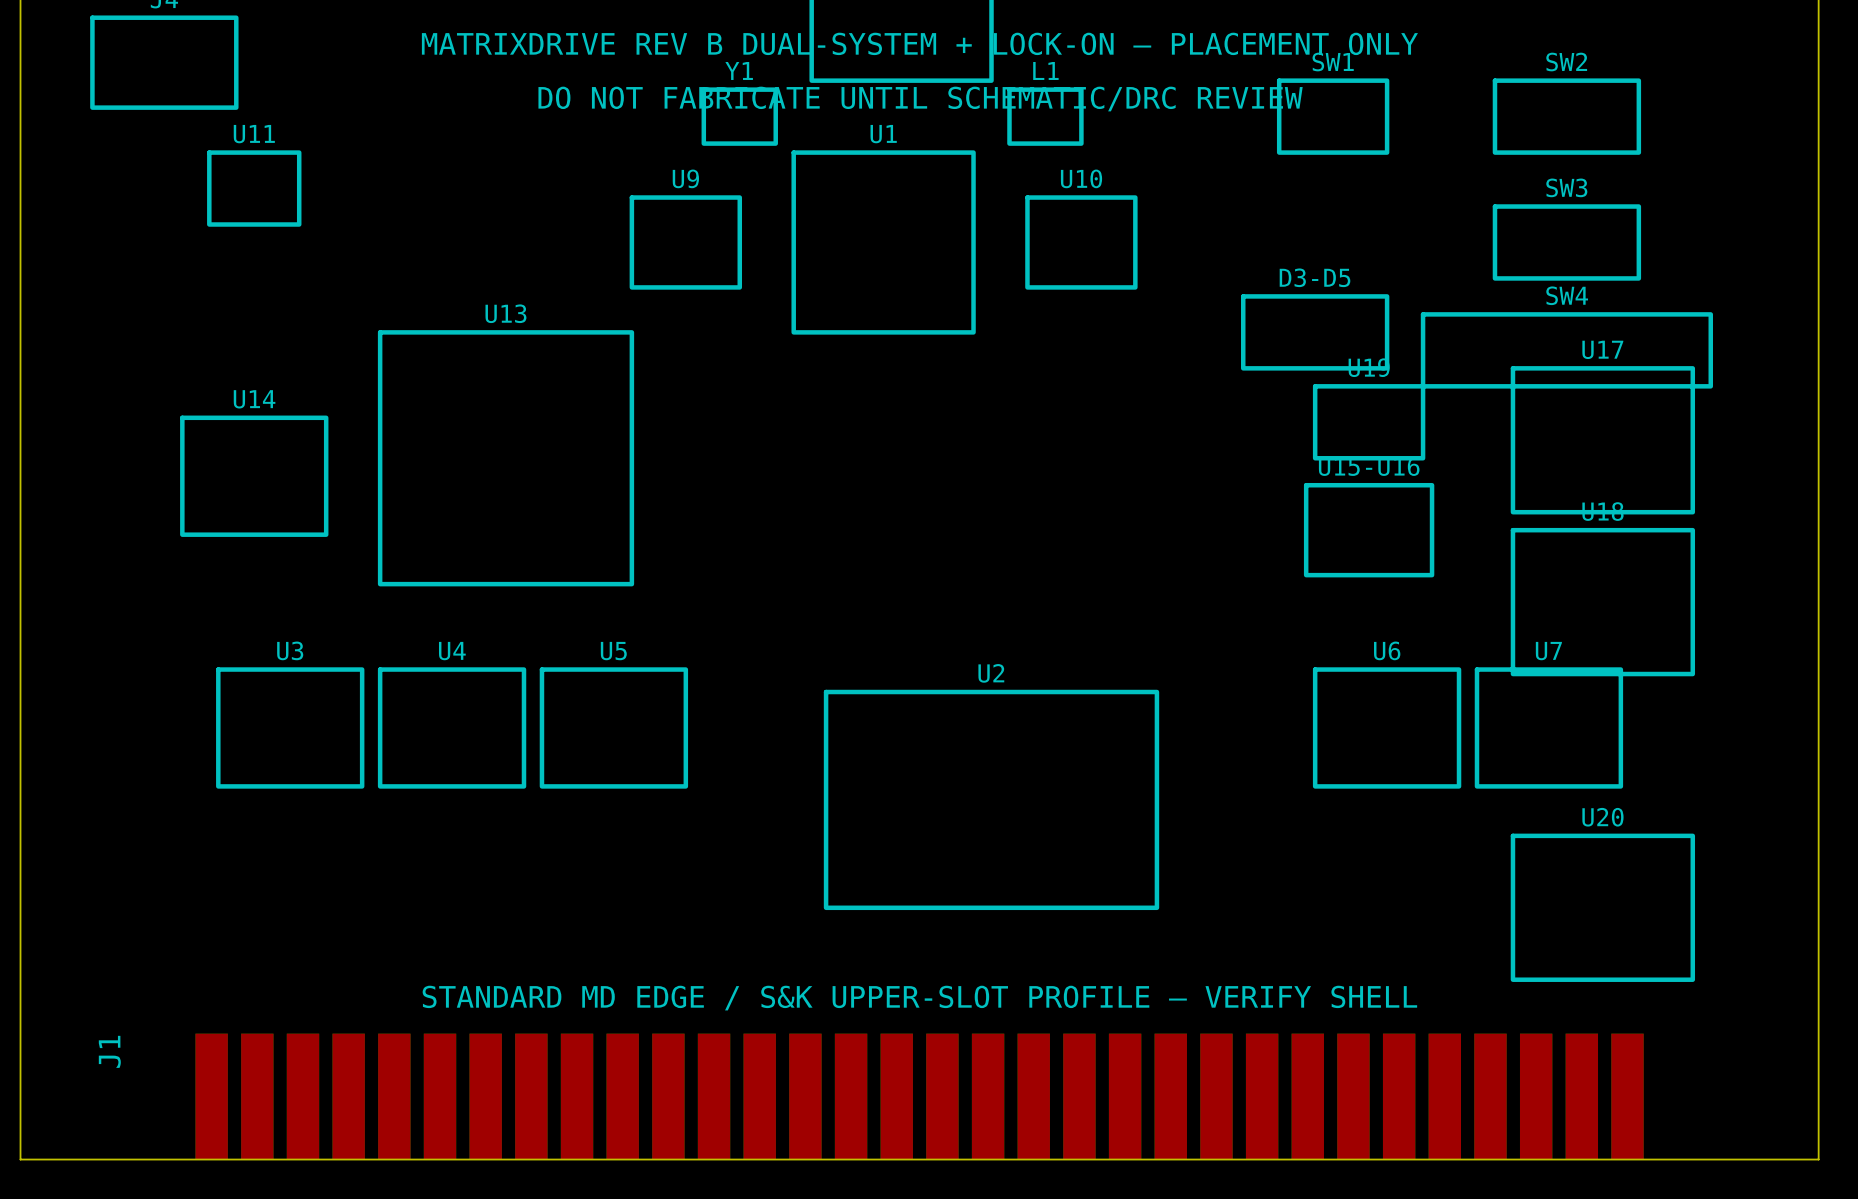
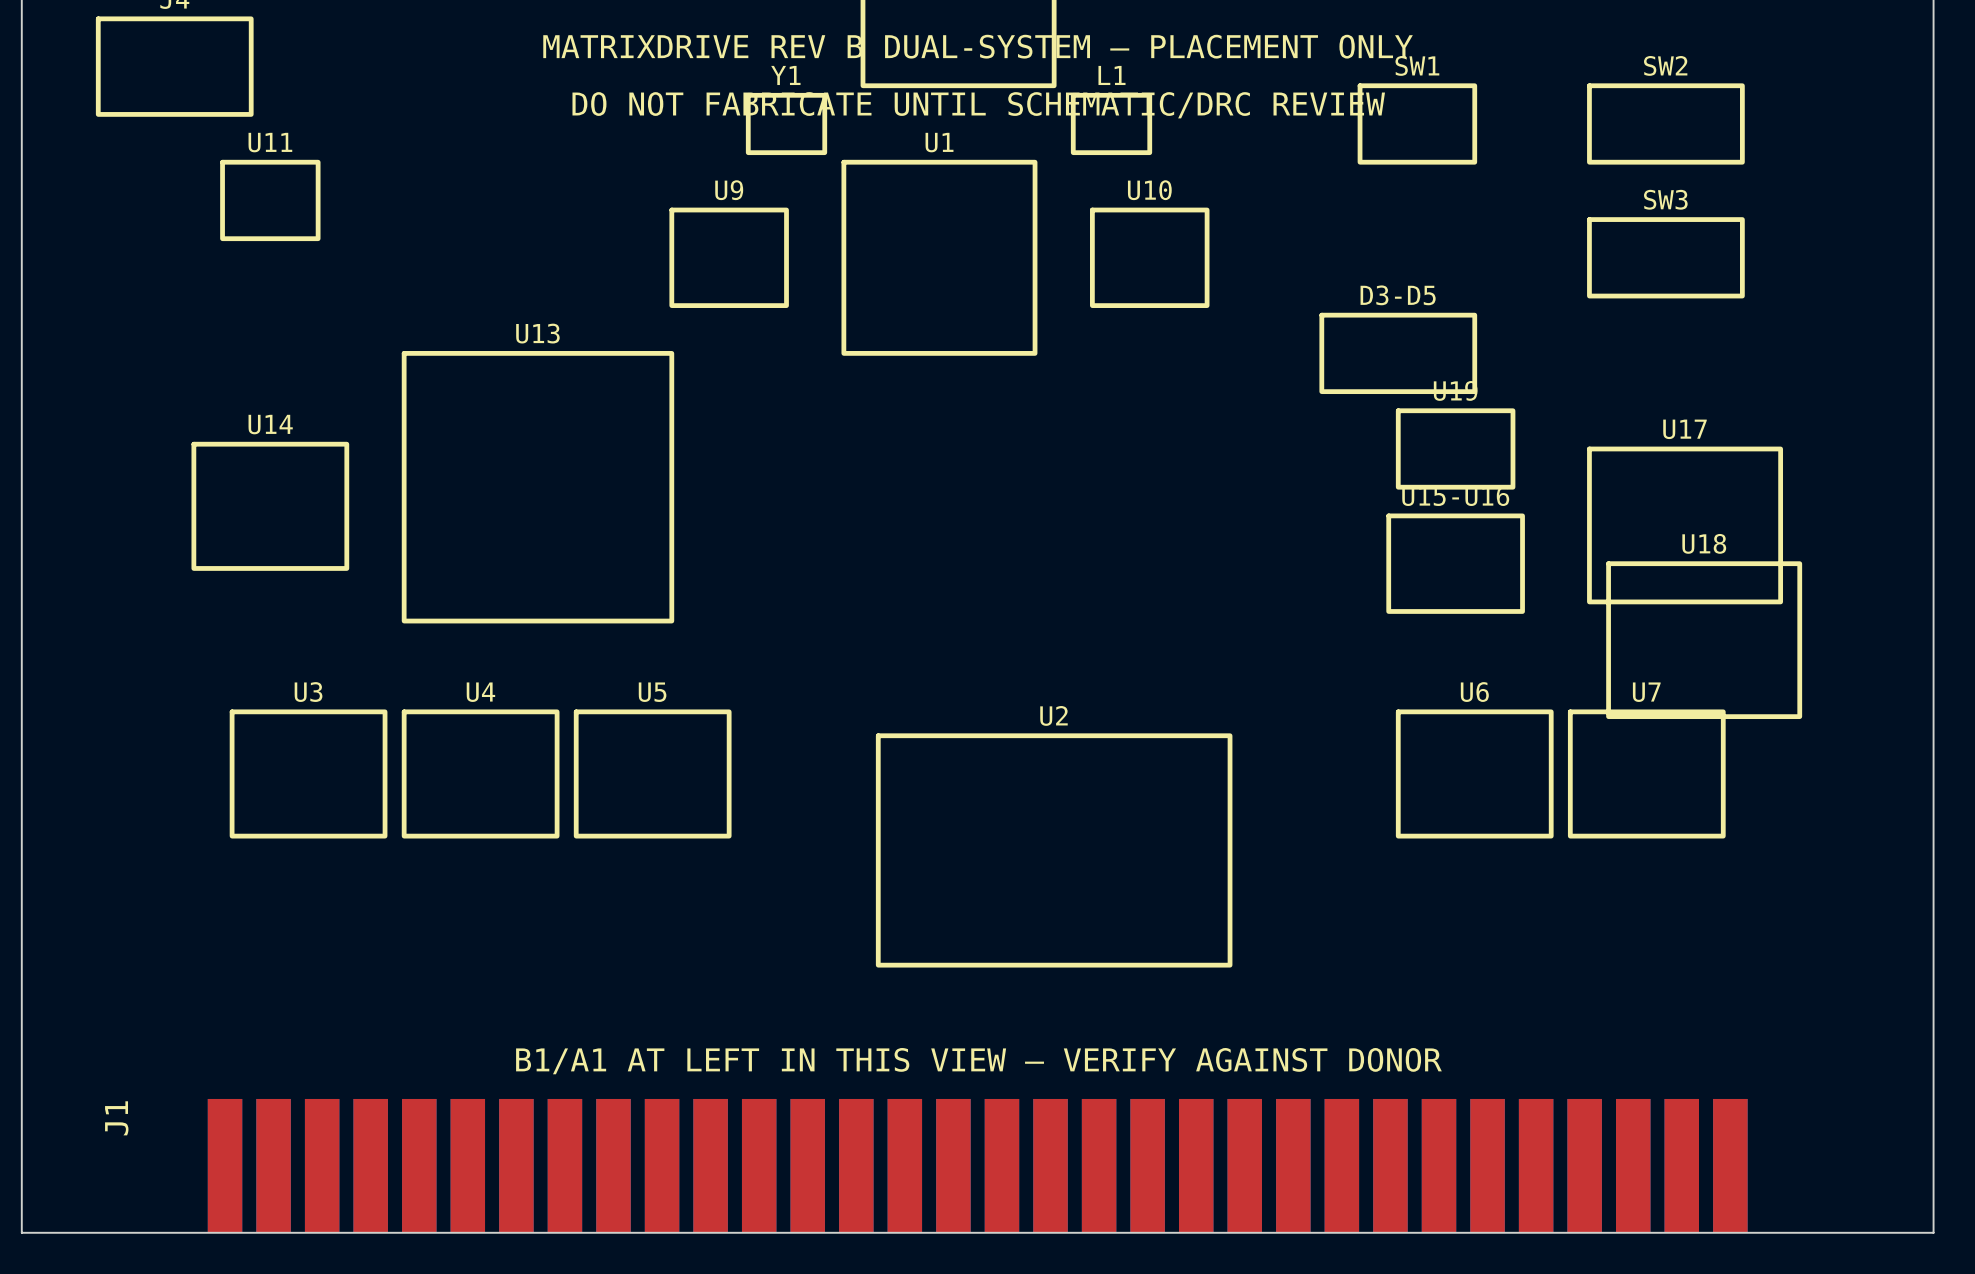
text: MATRIXDRIVE REV B DUAL-SYSTEM + LOCK-ON — PLACEMENT ONLY (919, 43) -> MATRIXDRIVE REV B DUAL-SYSTEM — PLACEMENT ONLY (978, 46)
SW4: (1566, 350) -> none
U17 position: (1602, 440) -> (1685, 525)
U20: (1602, 907) -> none
text: STANDARD MD EDGE / S&K UPPER-SLOT PROFILE — VERIFY SHELL (919, 998) -> B1/A1 AT LEFT IN THIS VIEW — VERIFY AGAINST DONOR (978, 1061)

